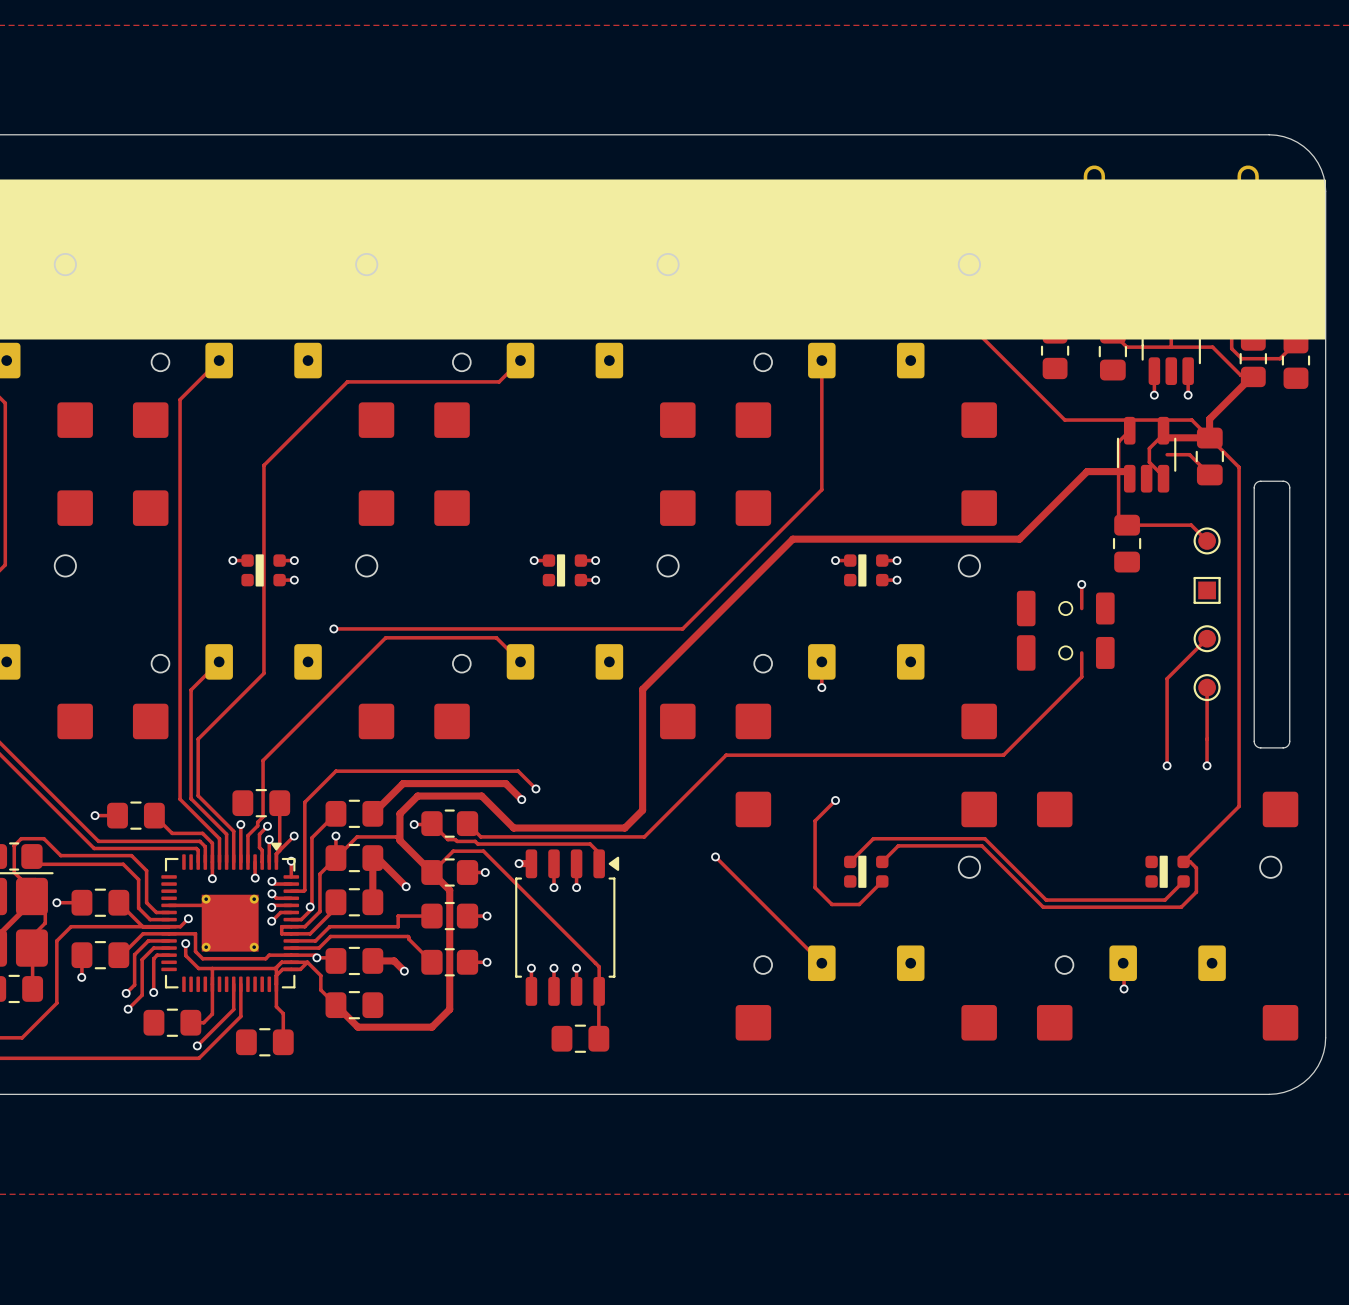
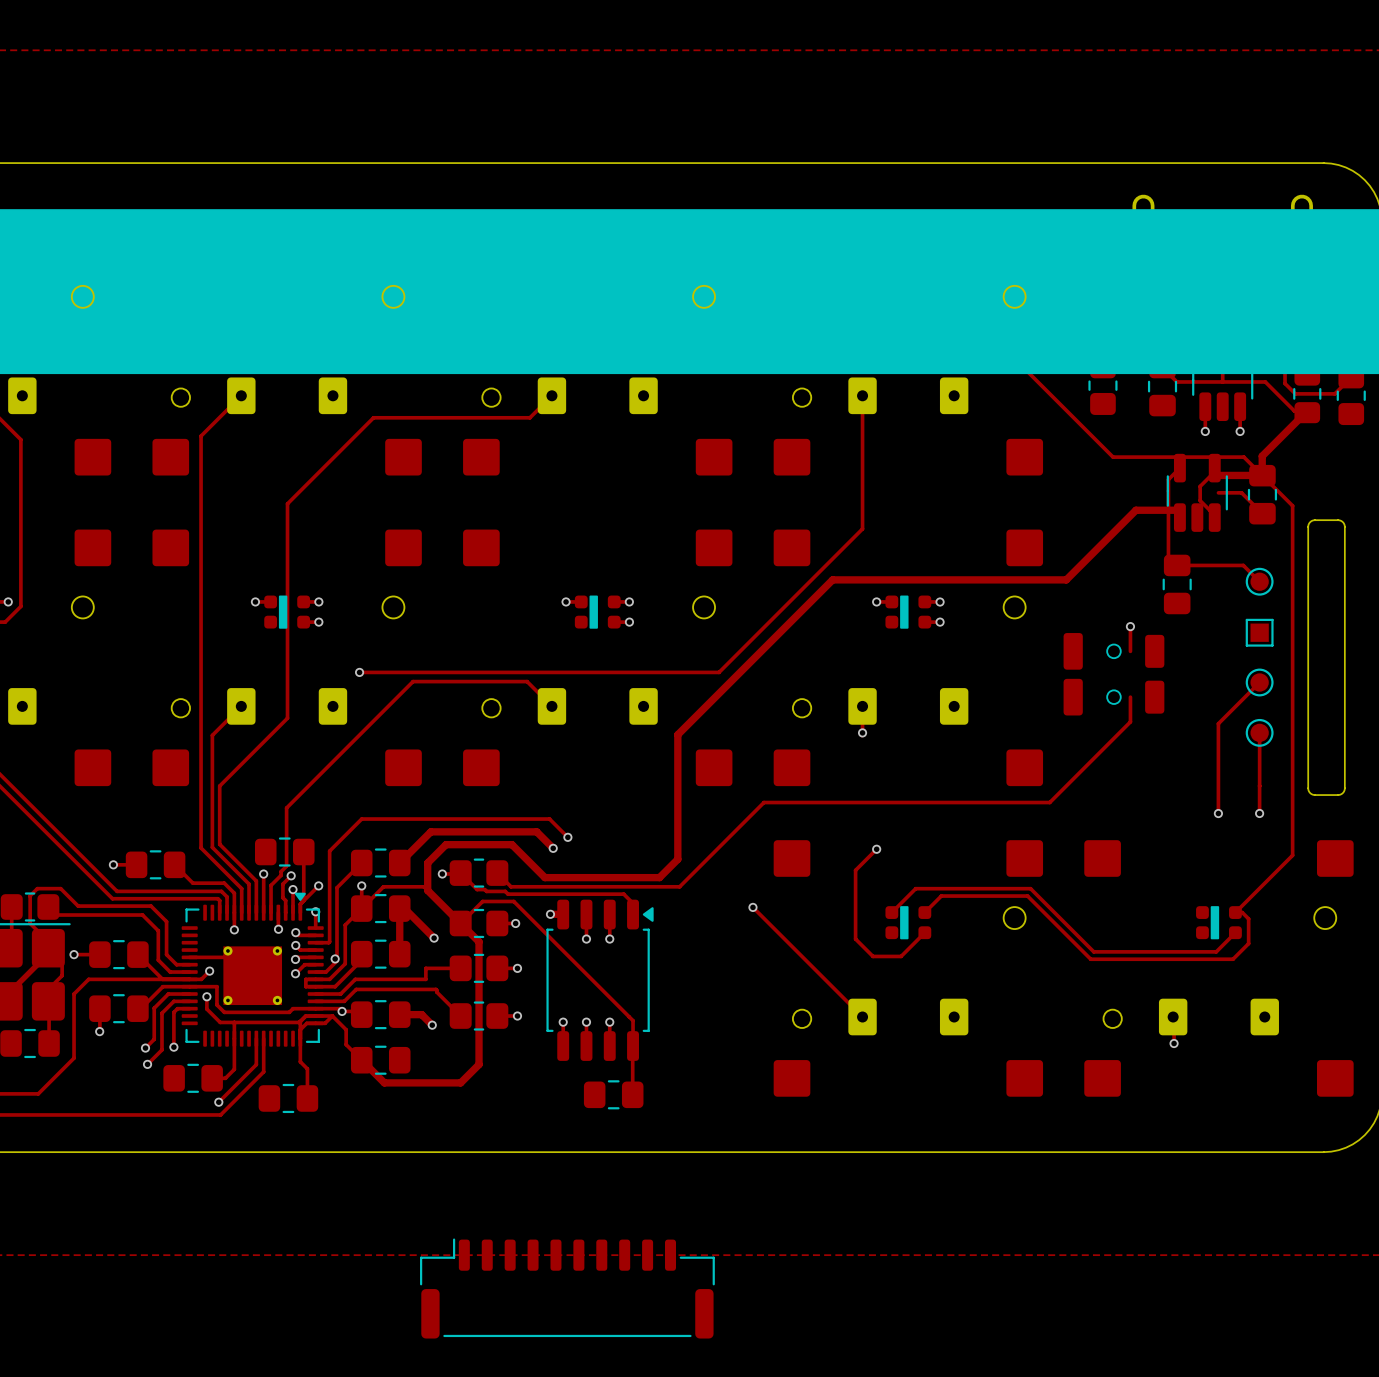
part: none -> (567, 1288)

